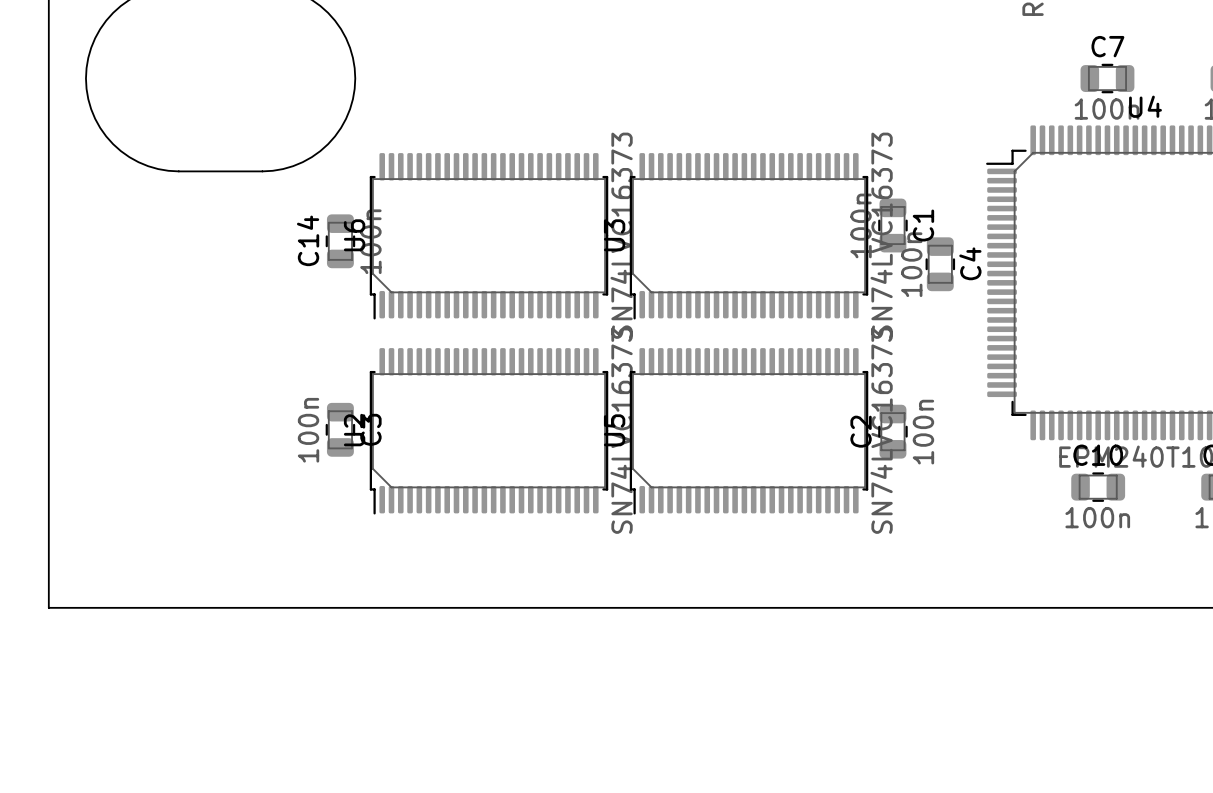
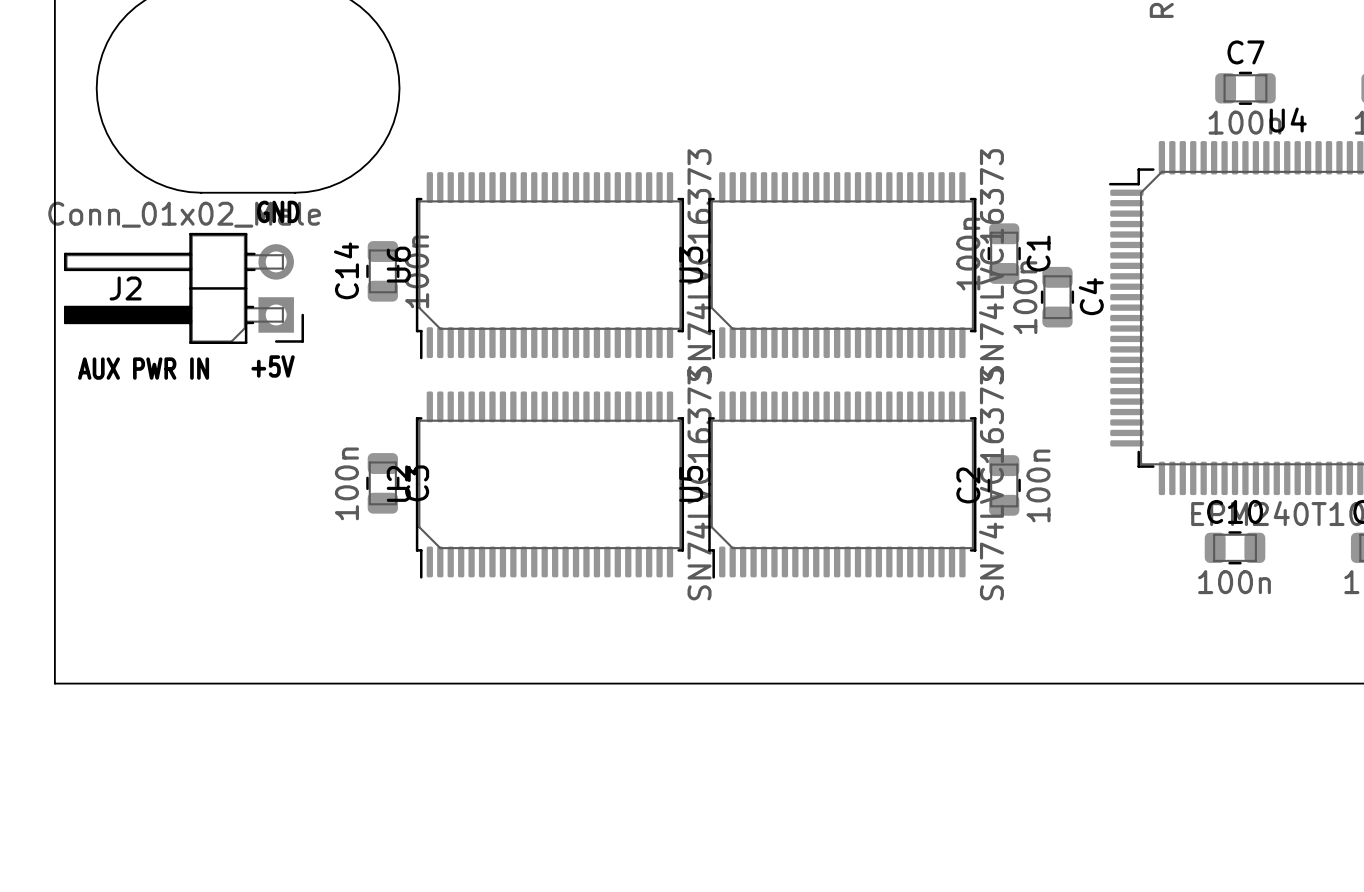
text: none -> GND (278, 211)
J2: none -> Conn_01x02_Male (183, 288)
text: none -> +5V (273, 366)
text: none -> AUX PWR IN (143, 368)

